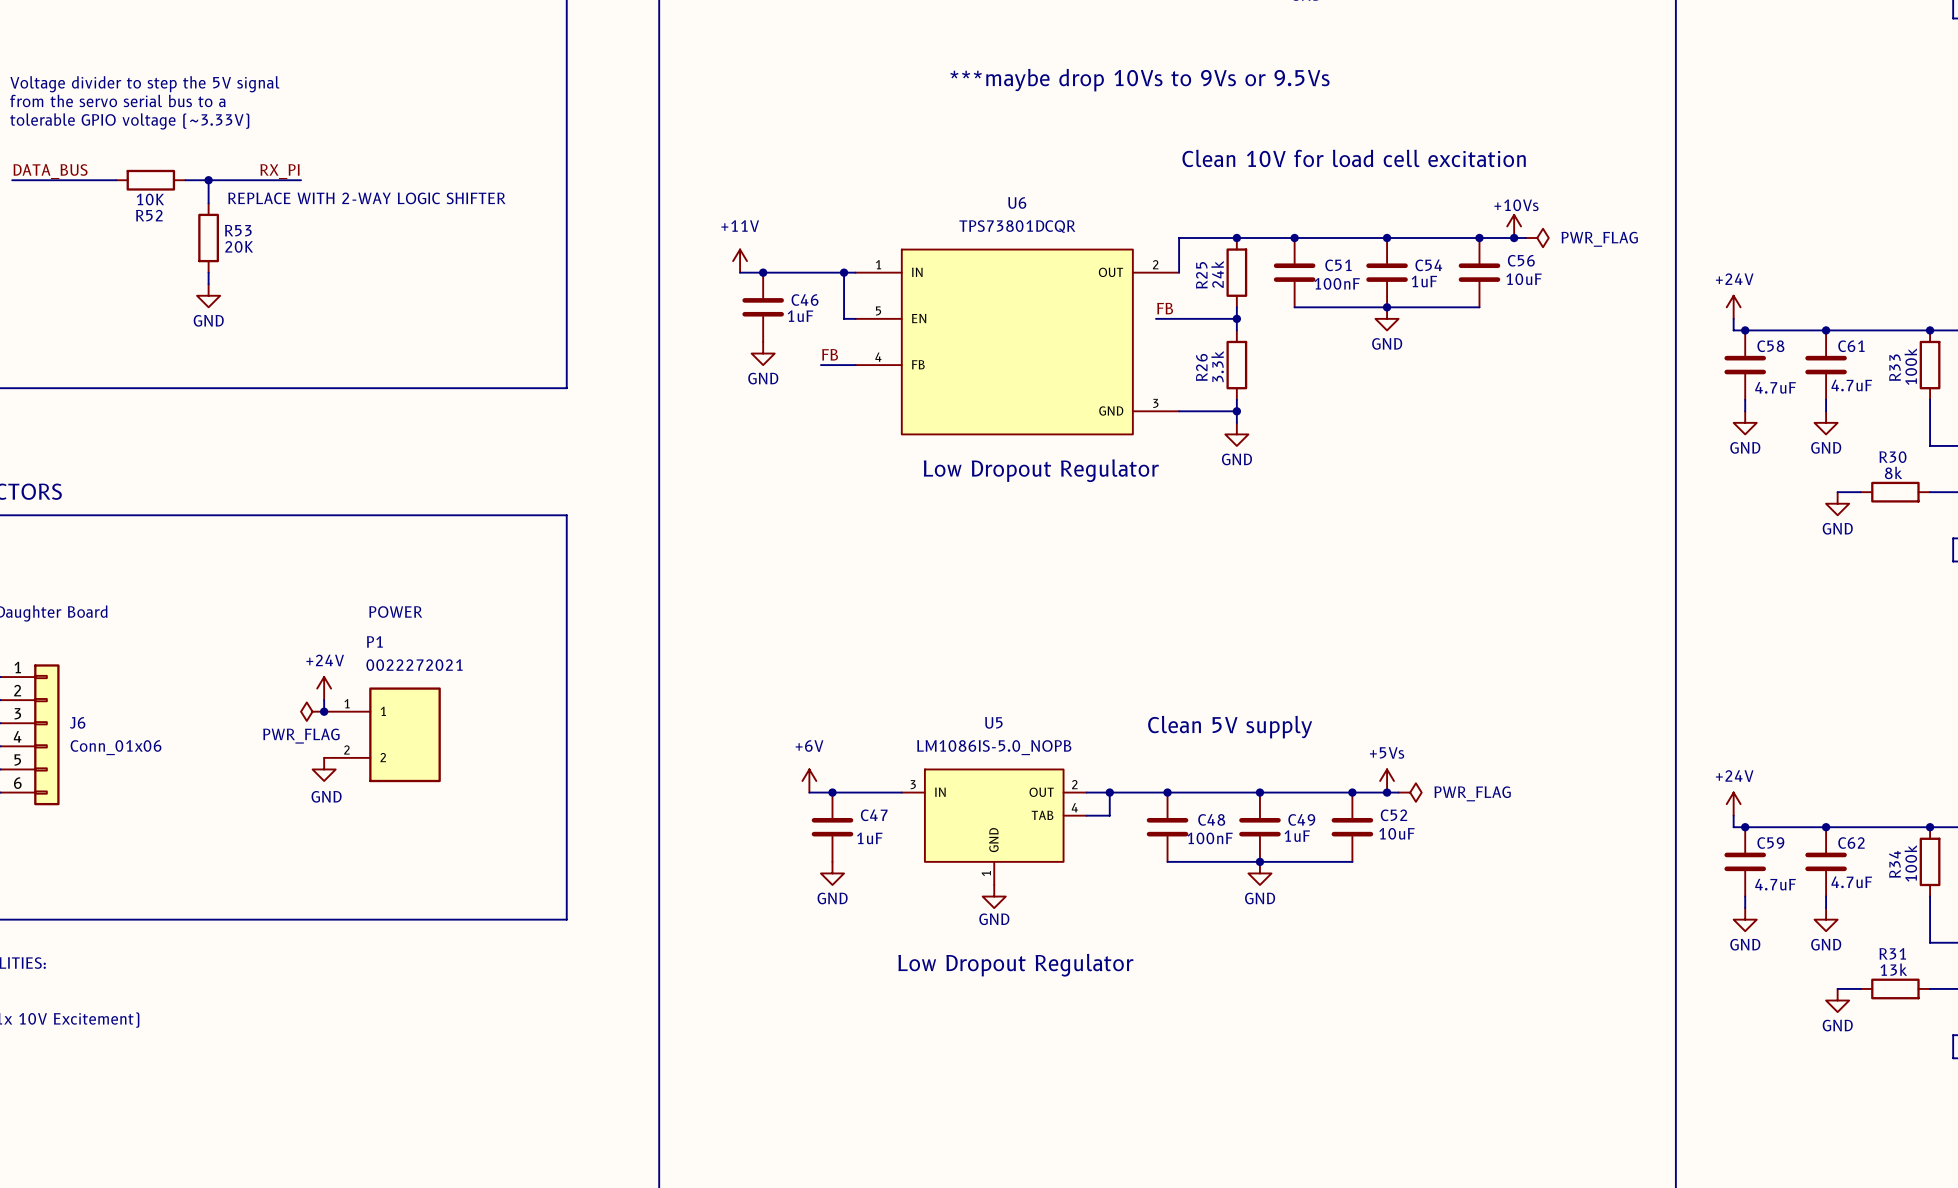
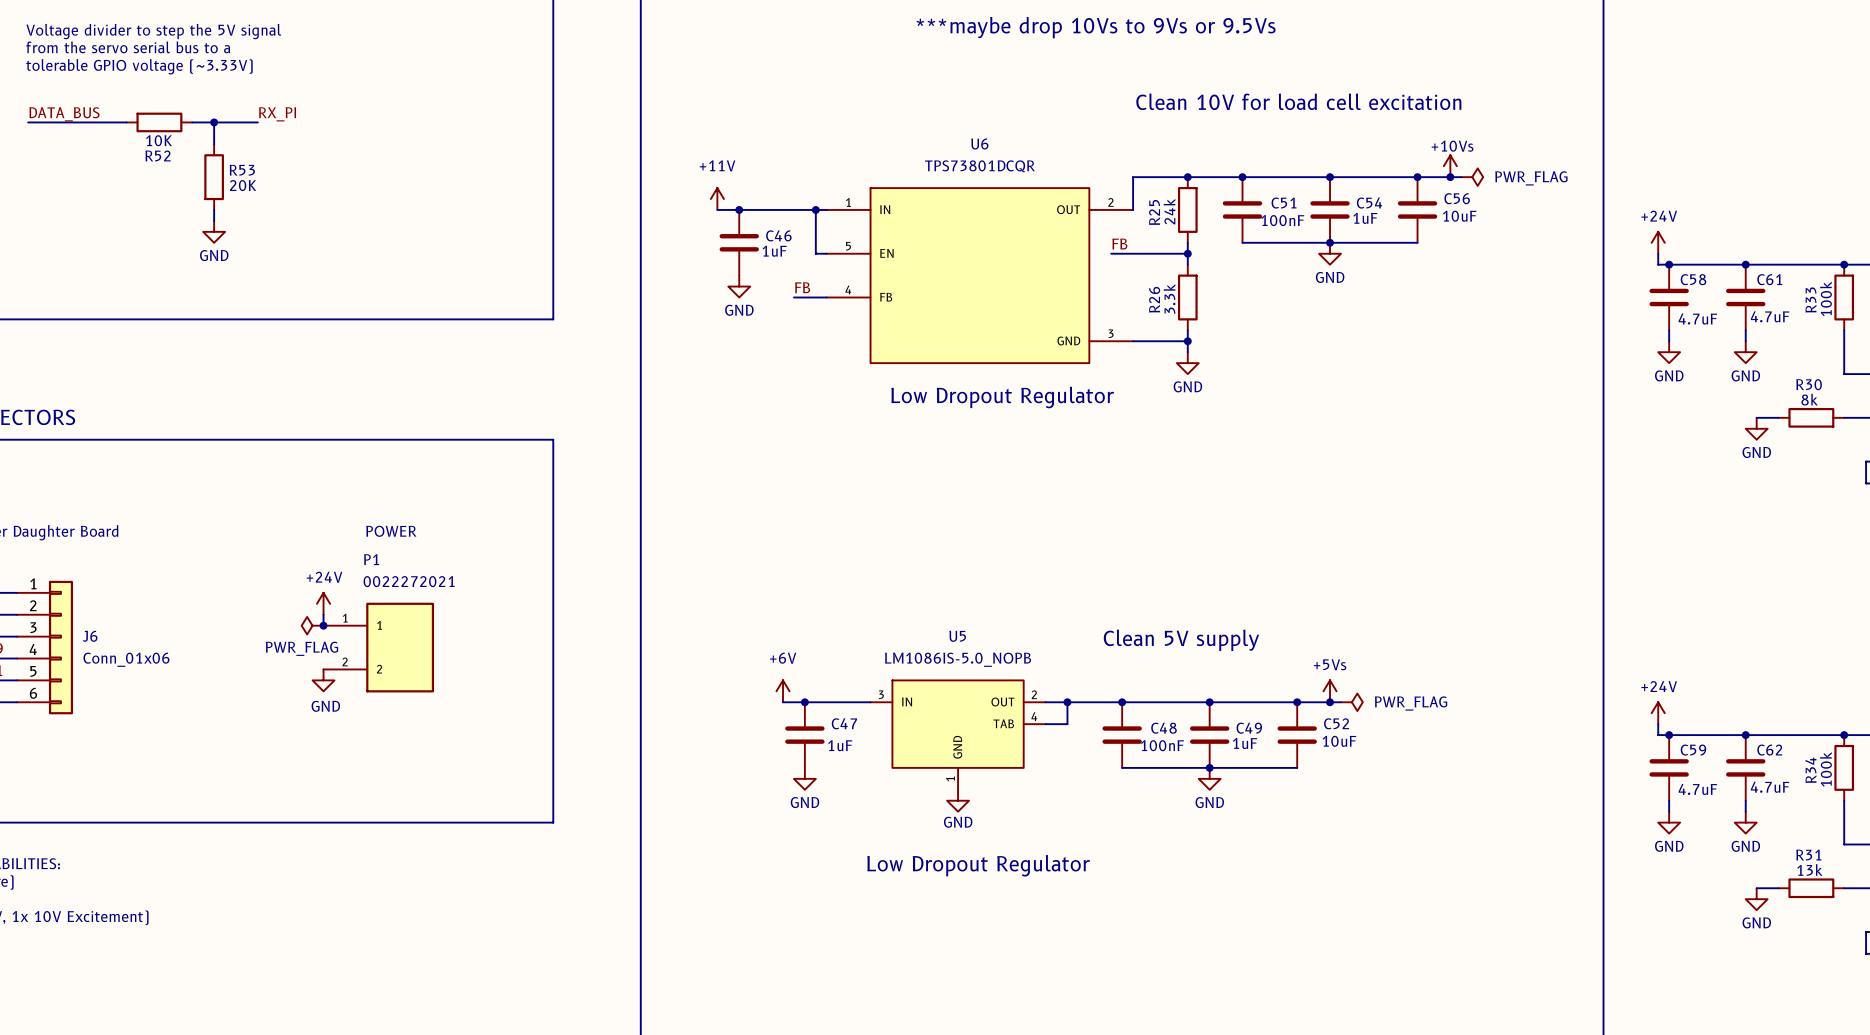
label position: RX_PI (279, 171) -> RX_PI (277, 114)
wire: (254, 180) (301, 180) -> none
text: REPLACE WITH 2-WAY LOGIC SHIFTER (366, 198) -> none

